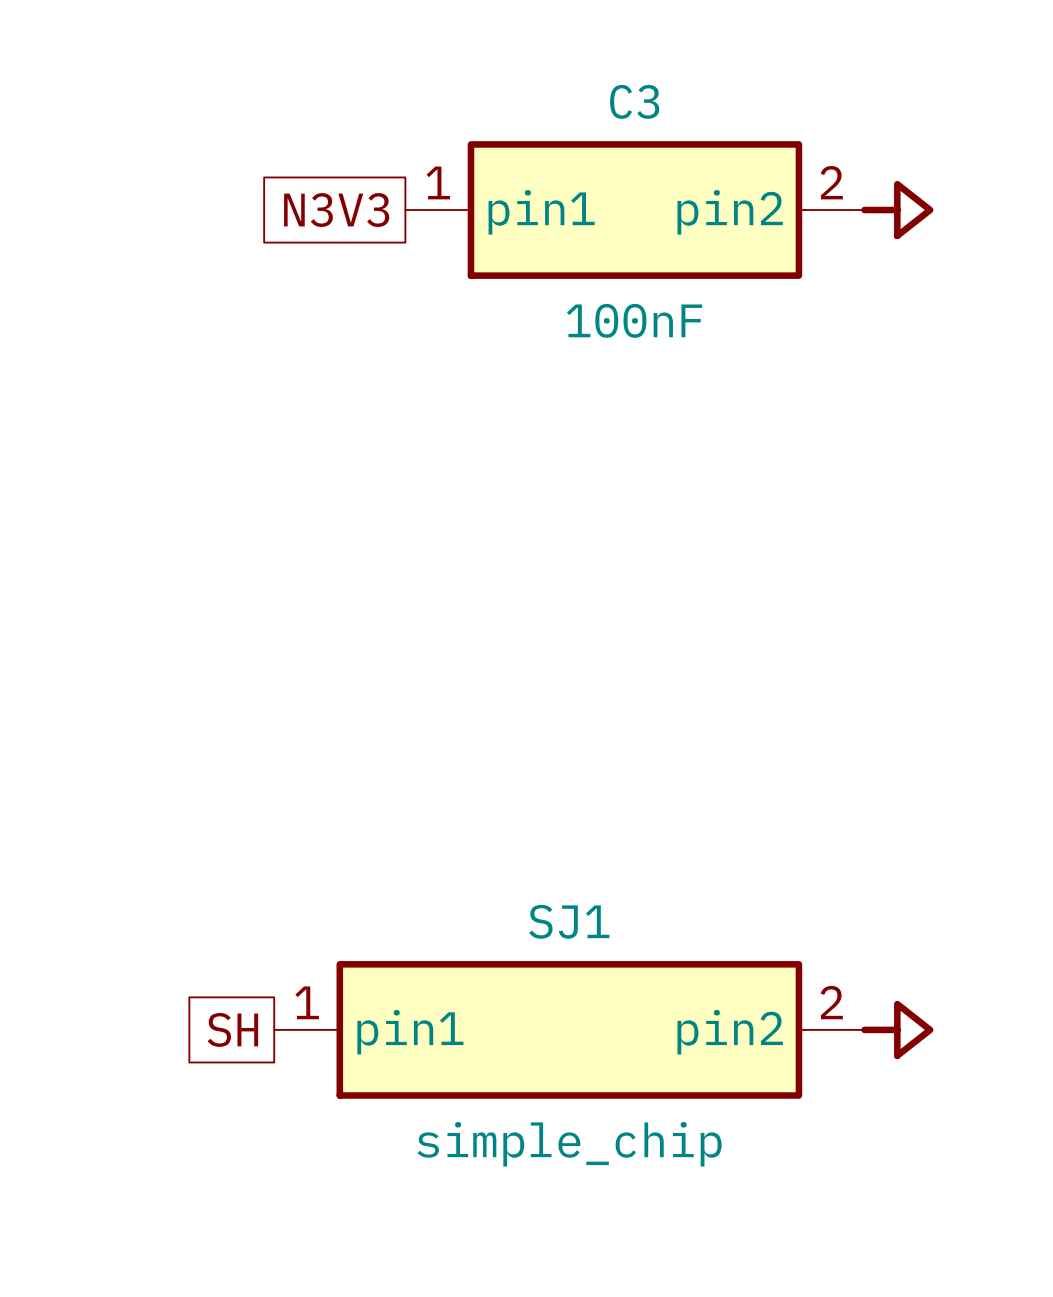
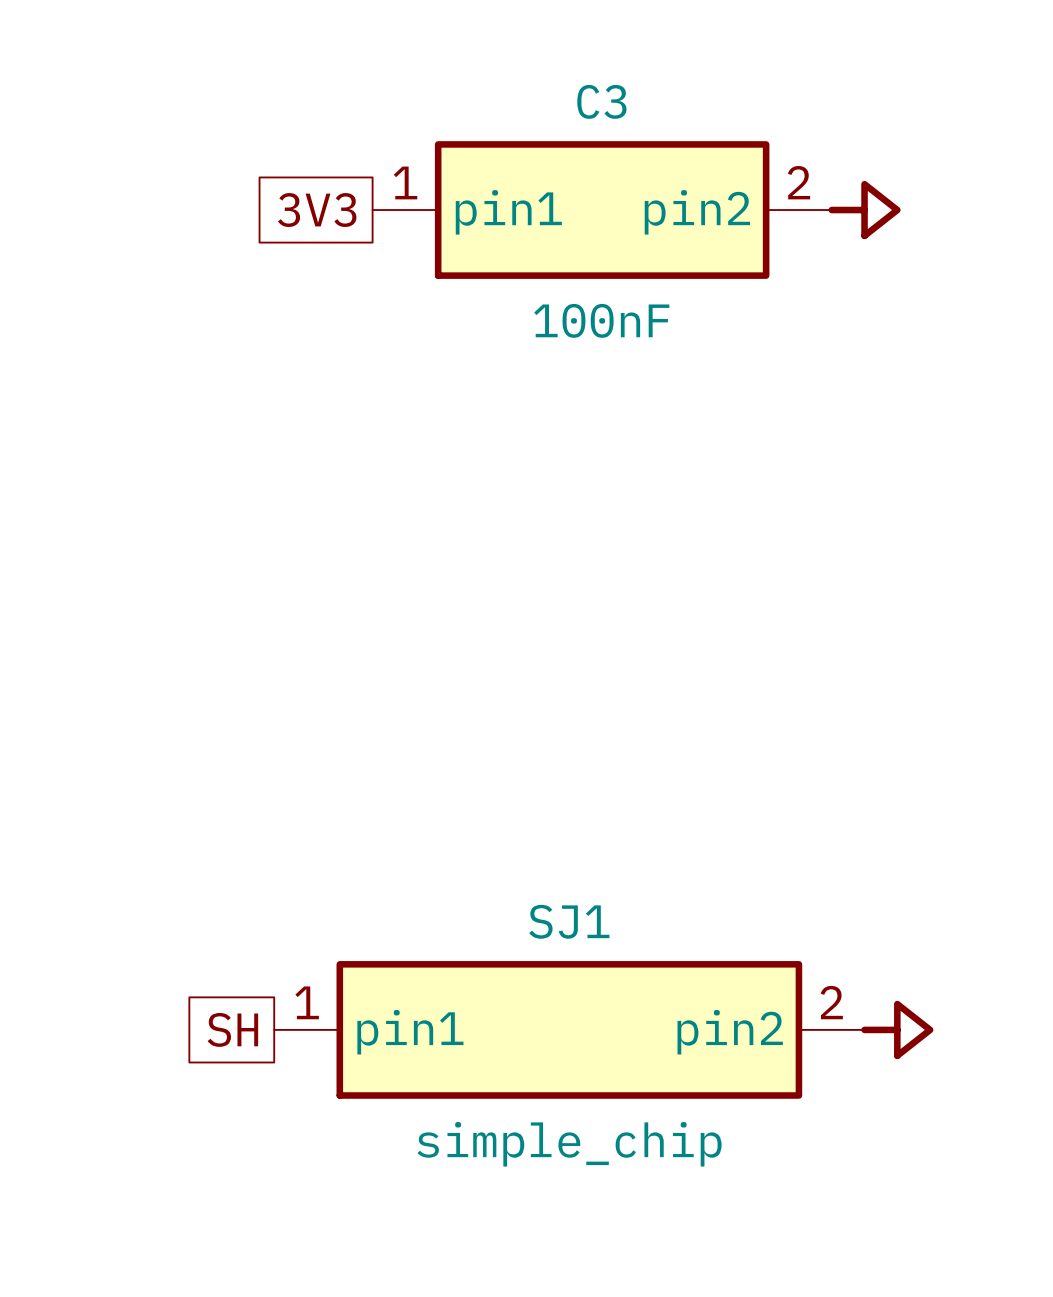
global label: N3V3 (336, 210) -> 3V3 (317, 210)
C3 position: (634, 210) -> (602, 210)
power symbol position: (897, 210) -> (864, 210)

